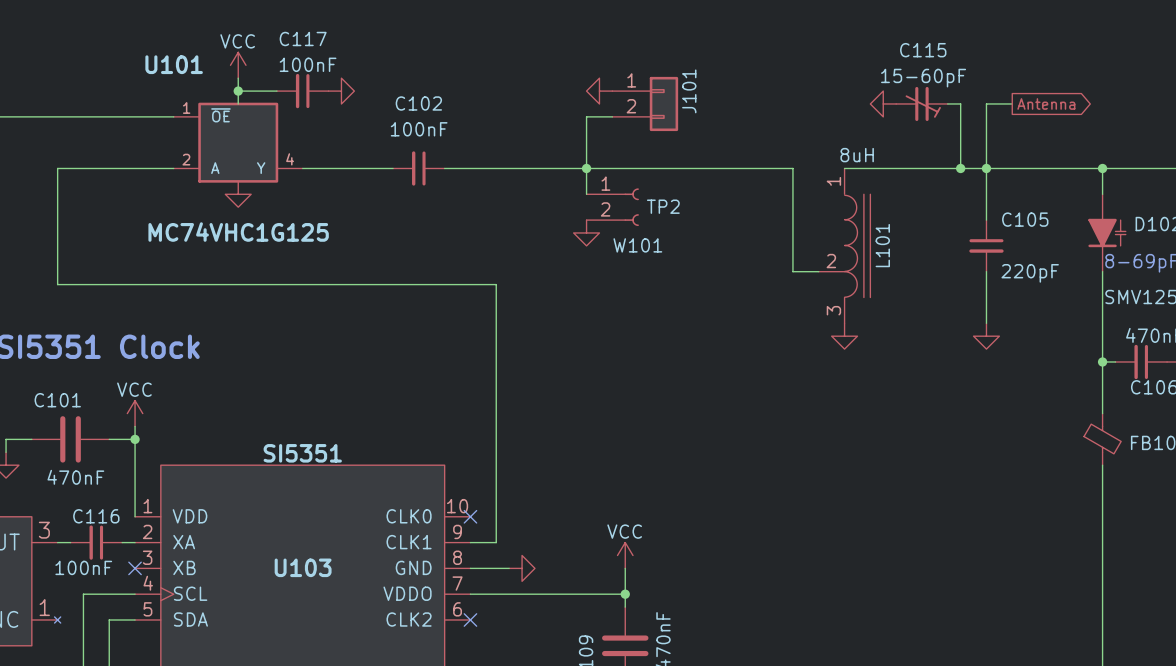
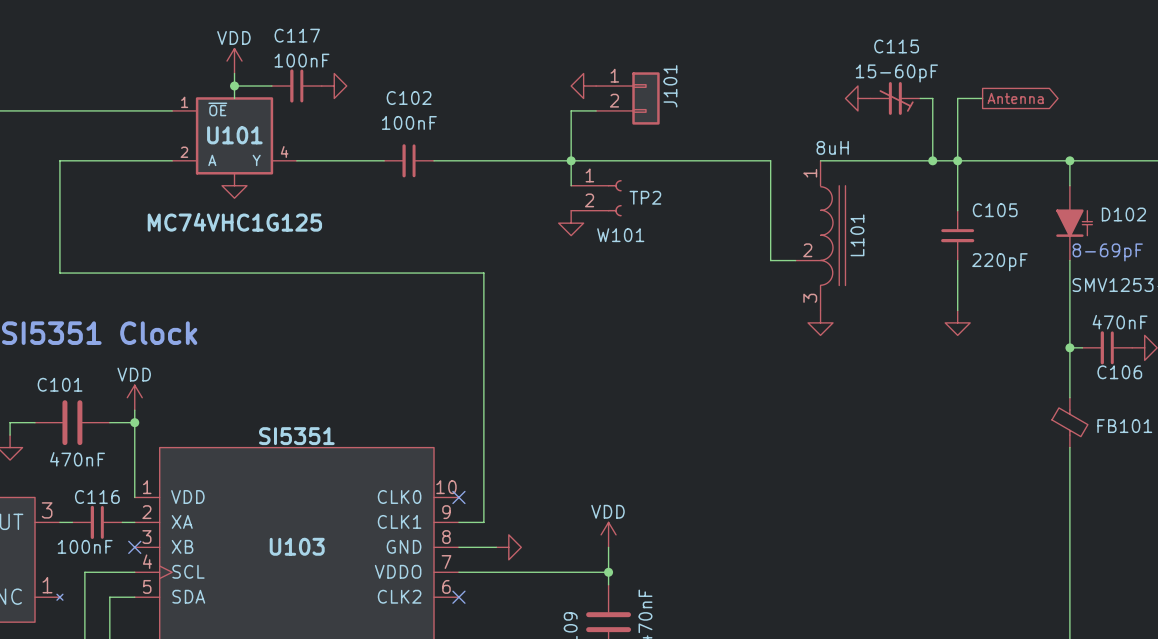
U101 name position: U101 (174, 64) -> U101 (234, 135)
power symbol: VCC (238, 65) -> VDD (234, 61)
power symbol: VCC (135, 413) -> VDD (134, 397)
power symbol: VCC (625, 555) -> VDD (608, 534)

